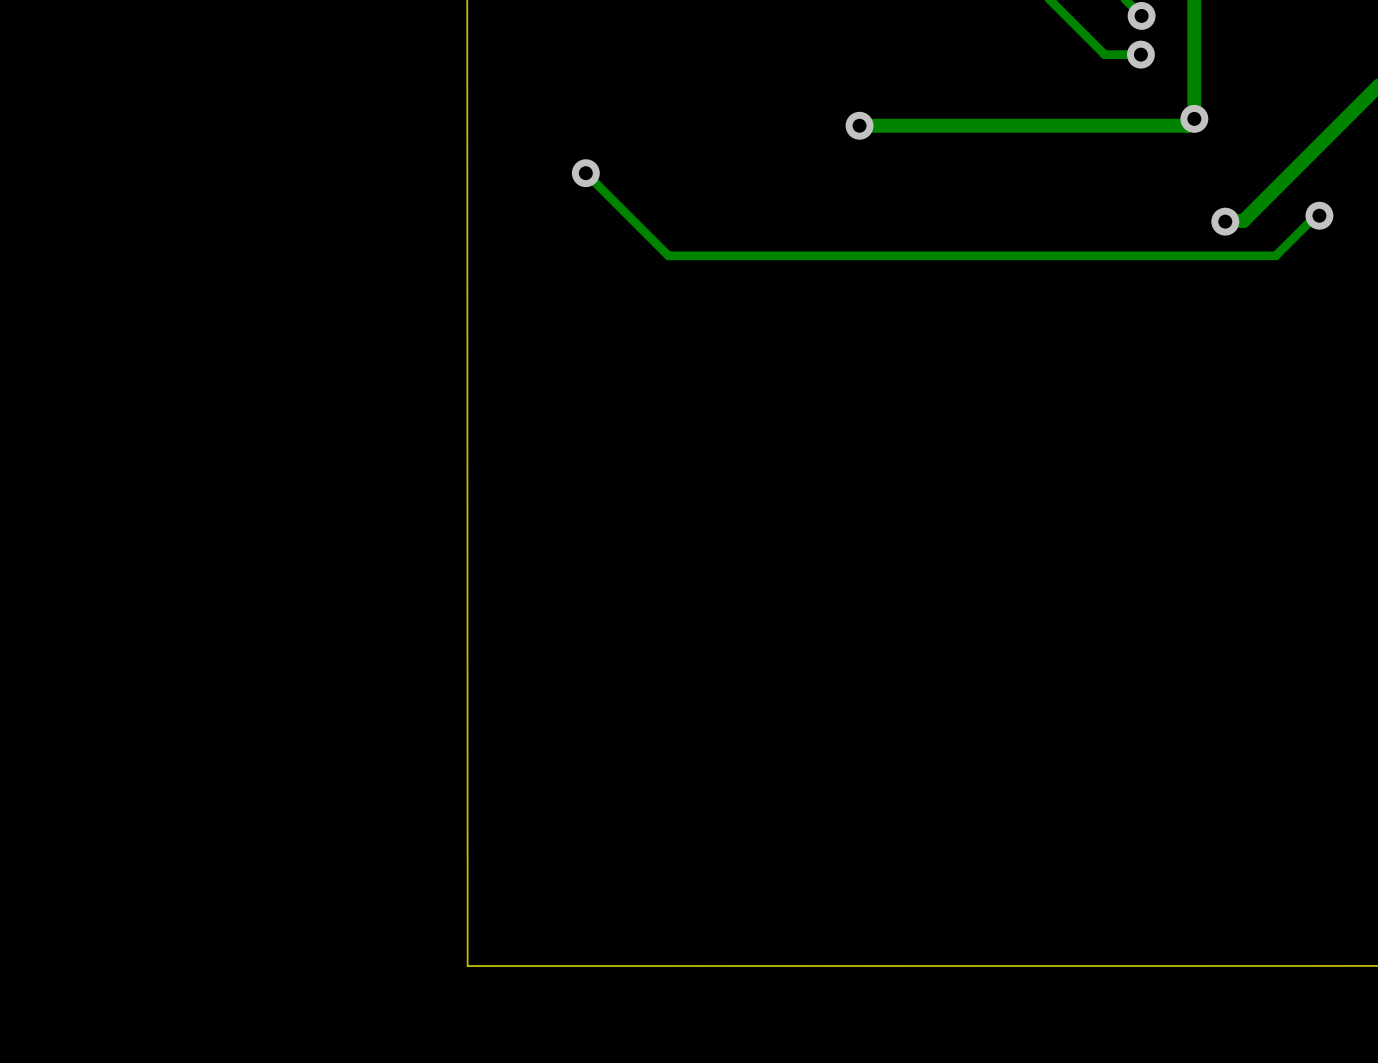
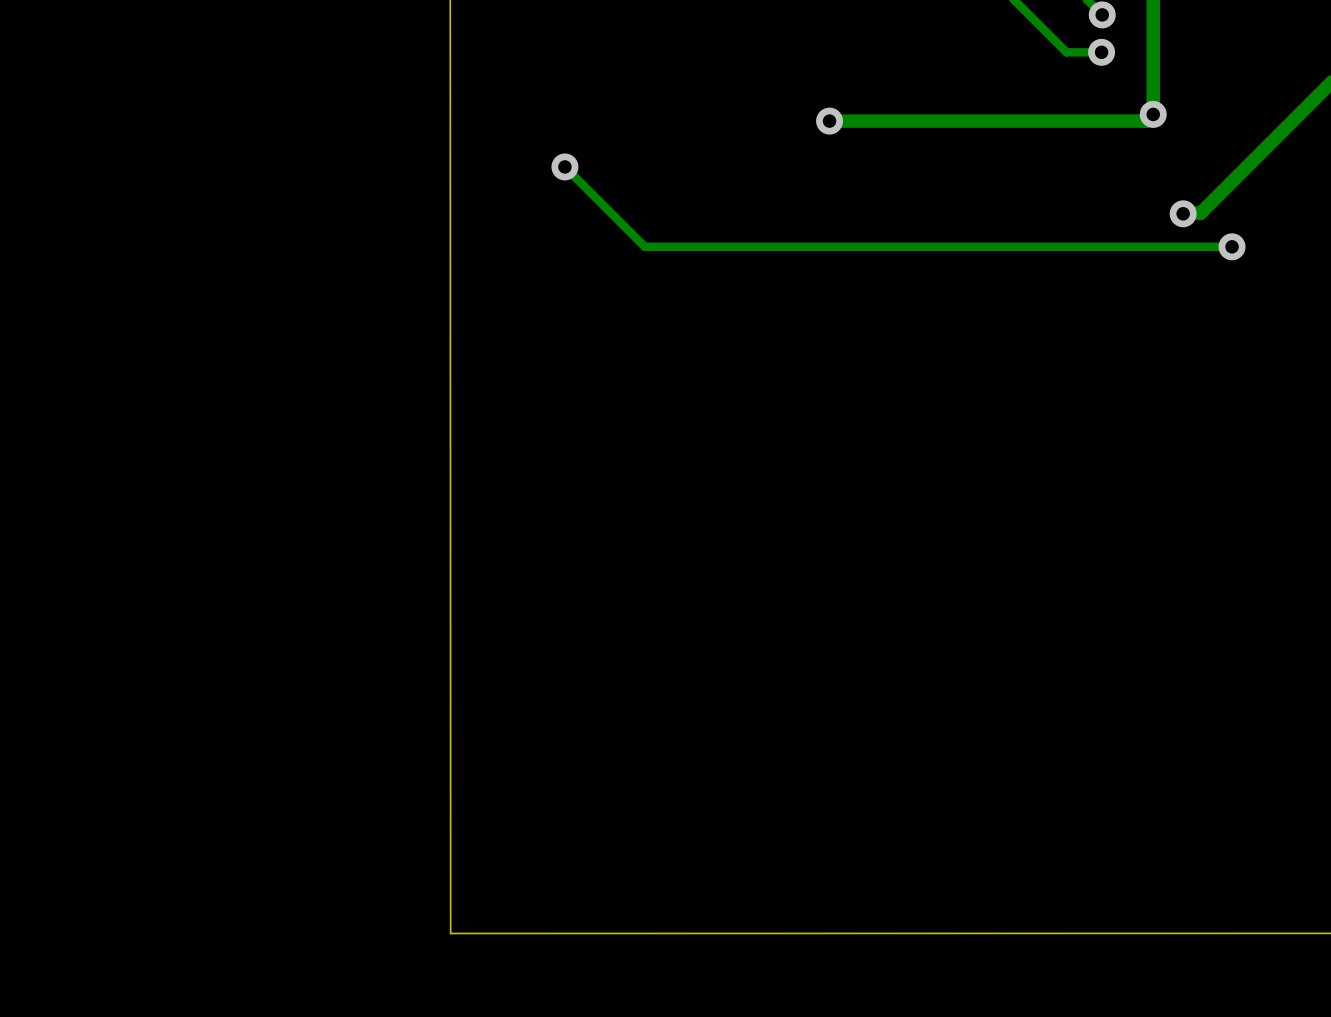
track: (1320, 210) (1275, 255) -> none
via position: (1319, 215) -> (1232, 246)

